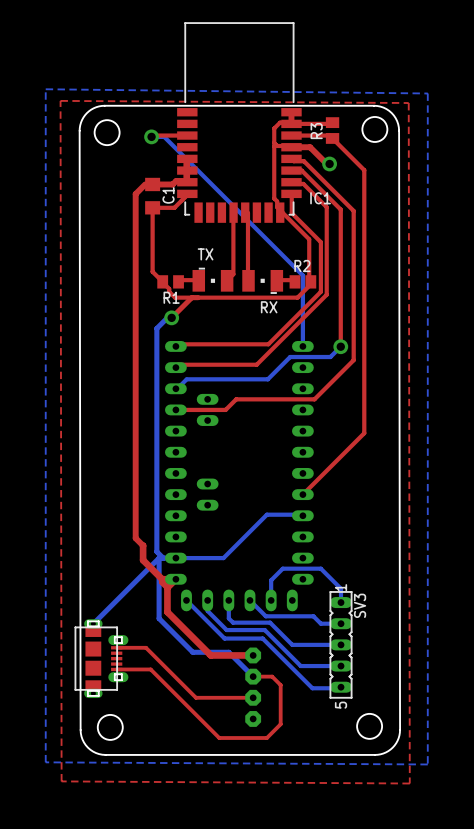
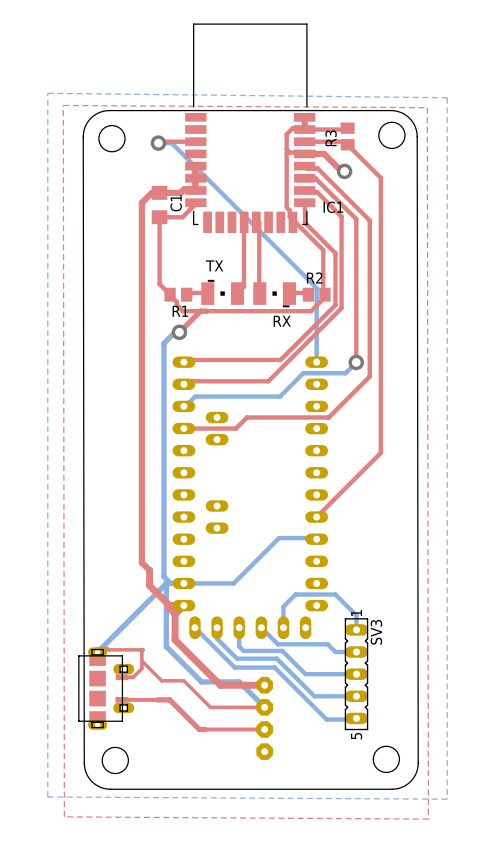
part footprint: [75, 619, 129, 699] -> [78, 647, 135, 730]
top track: none -> (97, 648) (142, 649) (141, 668) (133, 677)
top track: (127, 647) (146, 647) (196, 697) -> (157, 699) (169, 699) (199, 729) (204, 729)
top track: (150, 669) (219, 738) (266, 738) (280, 724) (280, 685) (272, 676) (253, 676) -> (141, 660) (161, 680) (183, 680) (210, 707) (264, 707)

